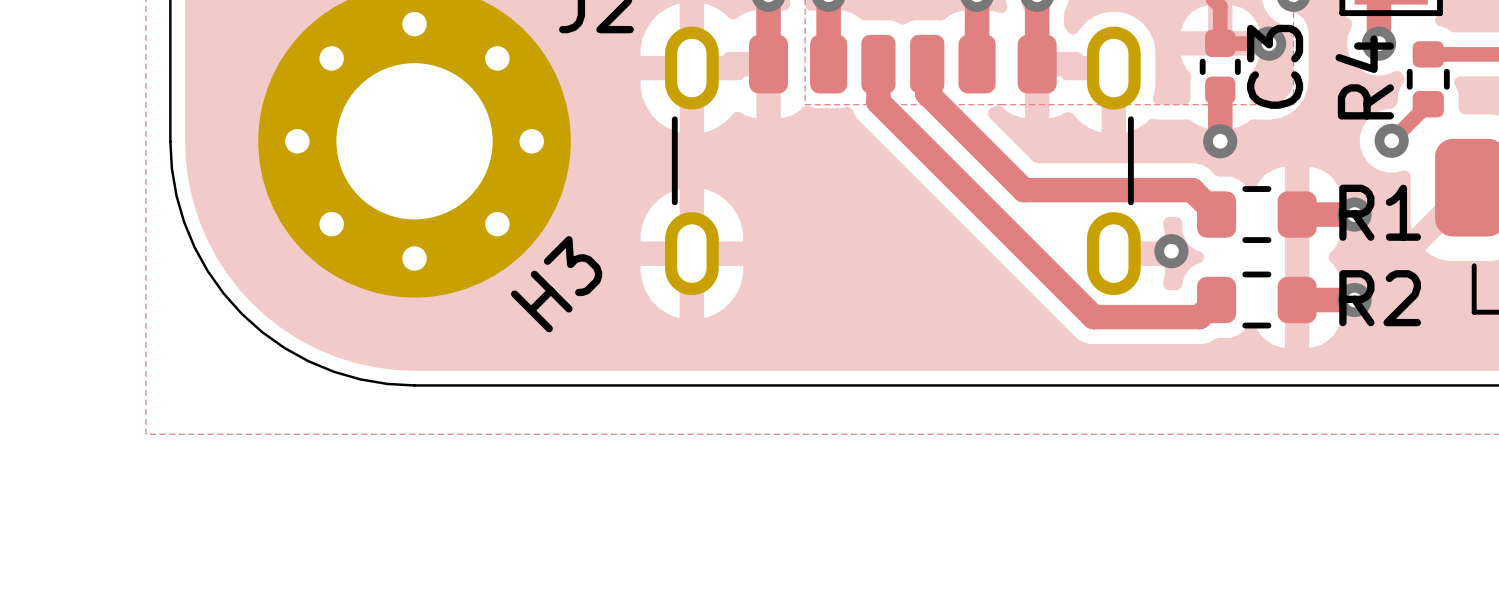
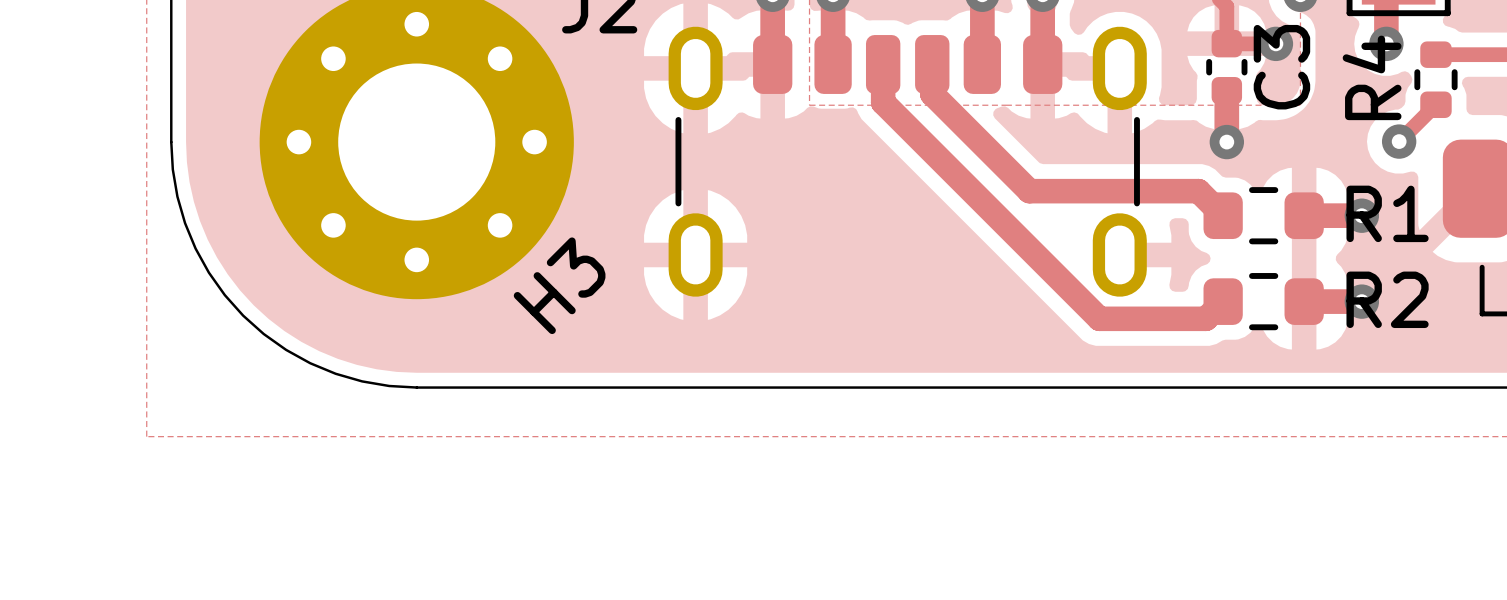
via: (1171, 251) -> none

